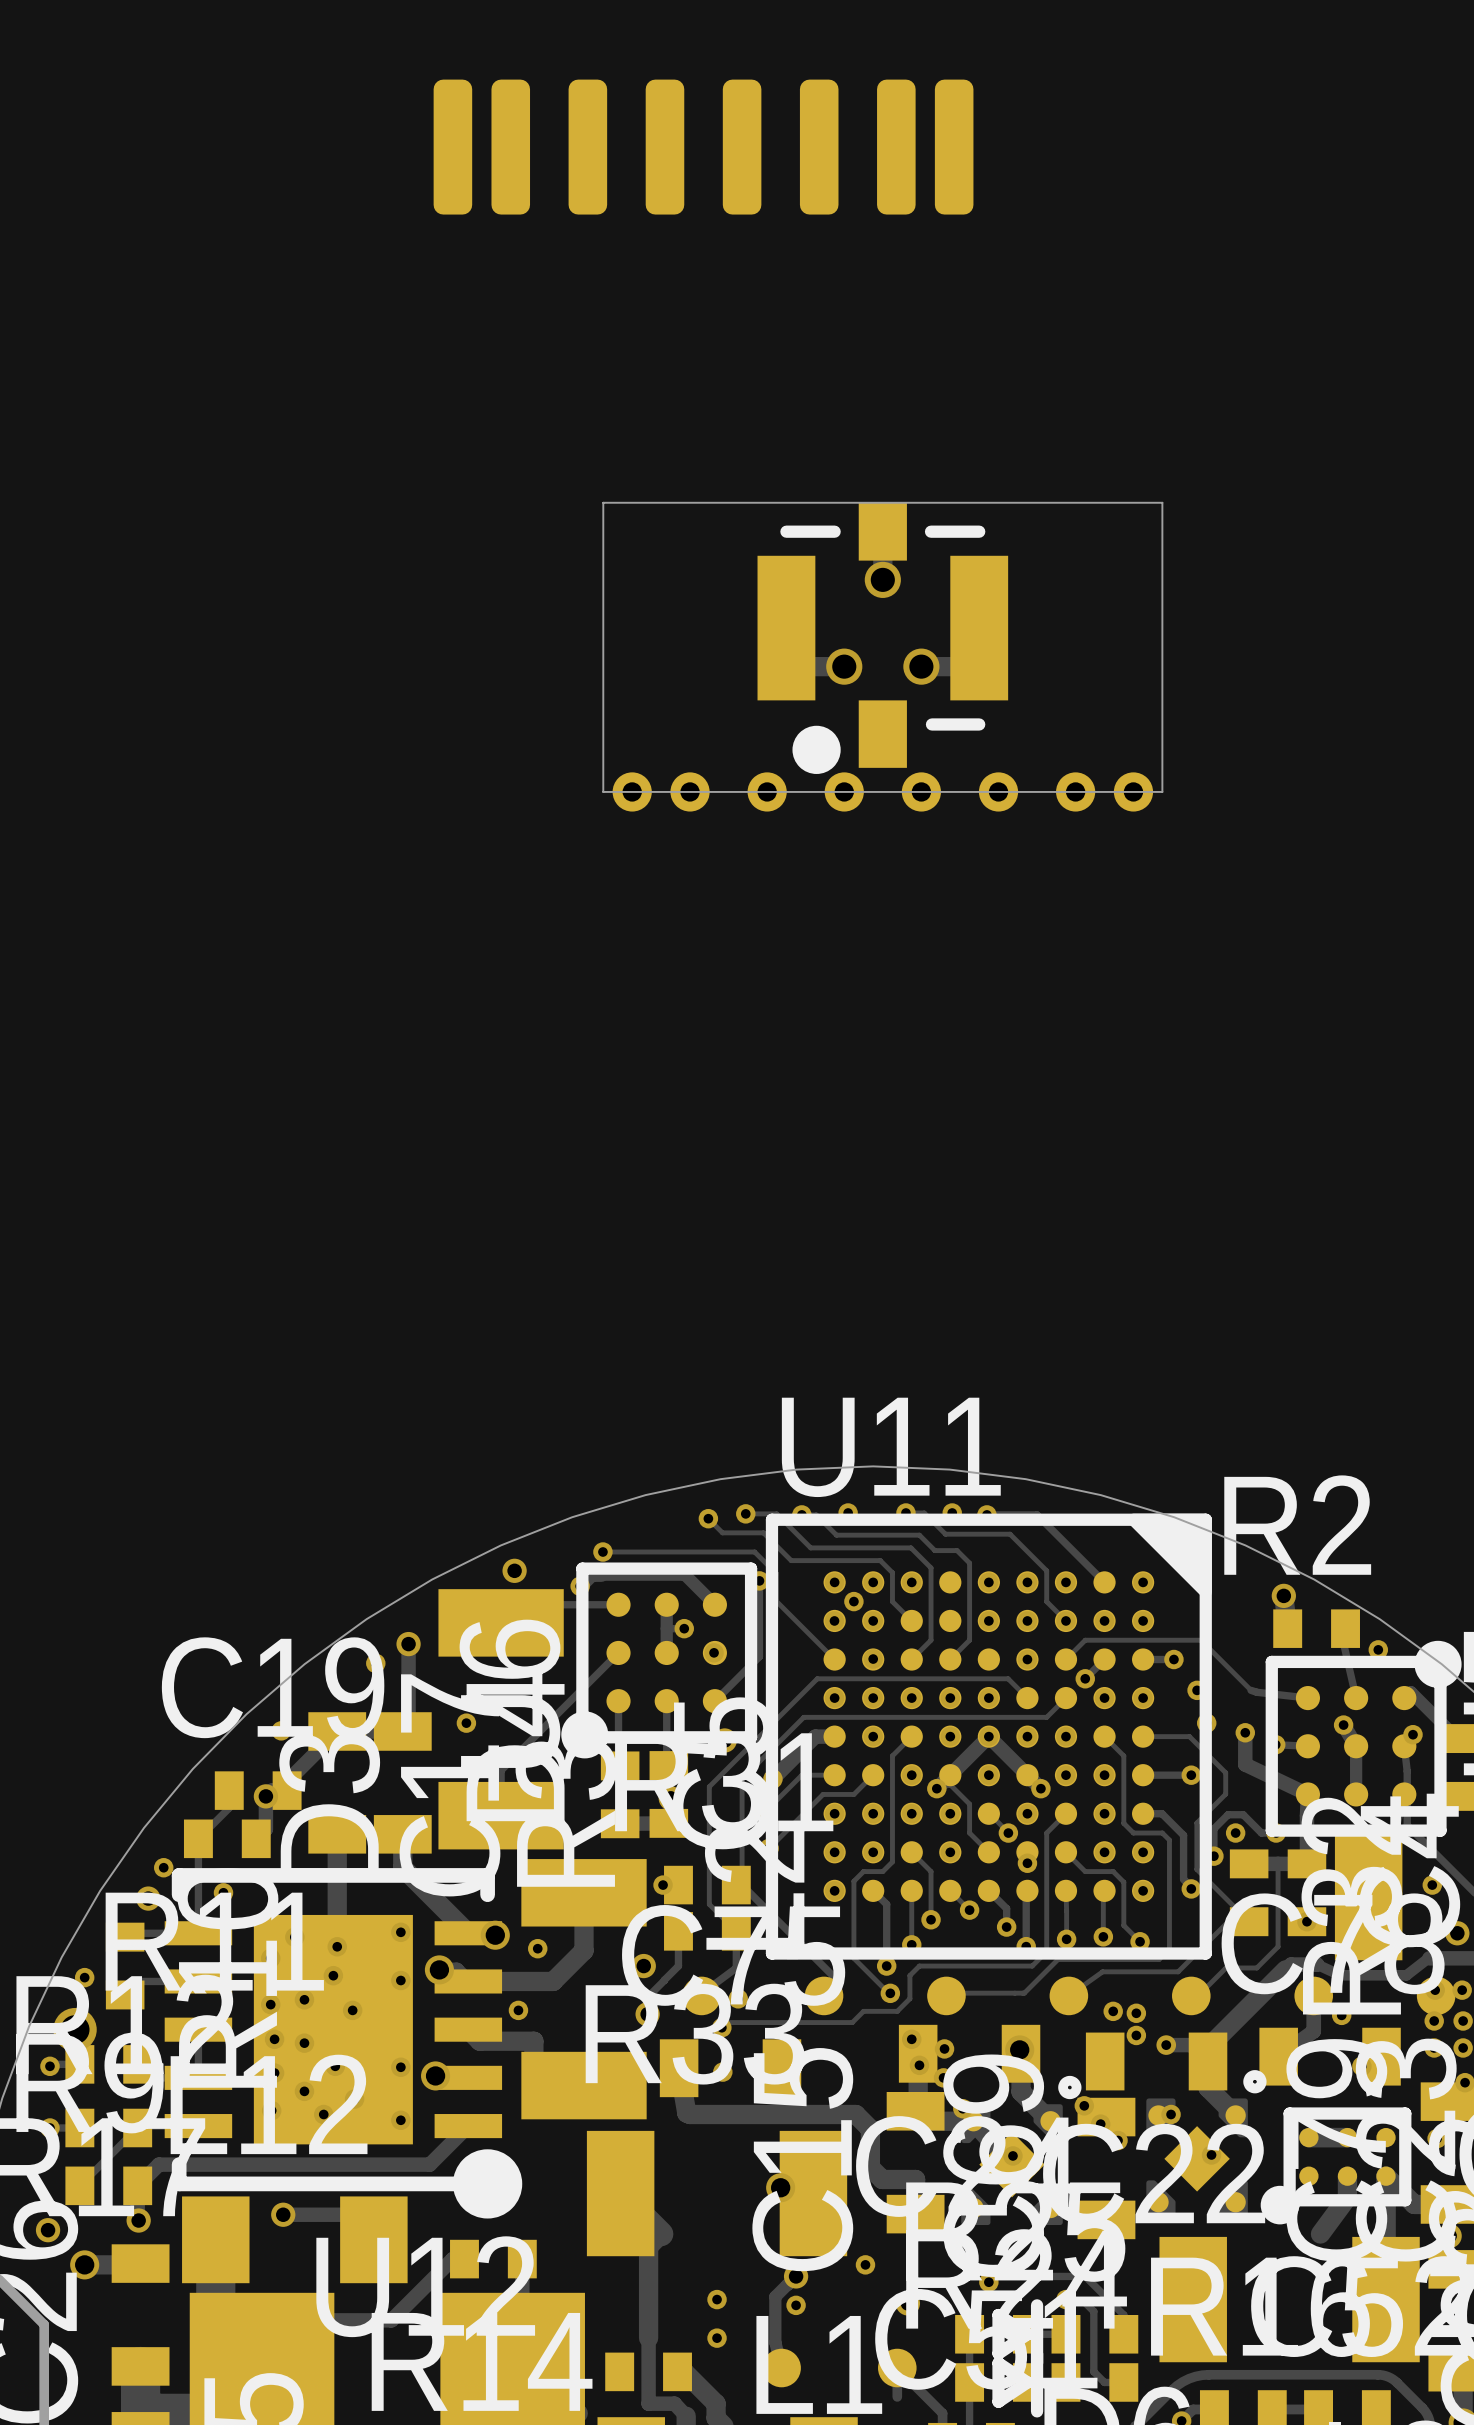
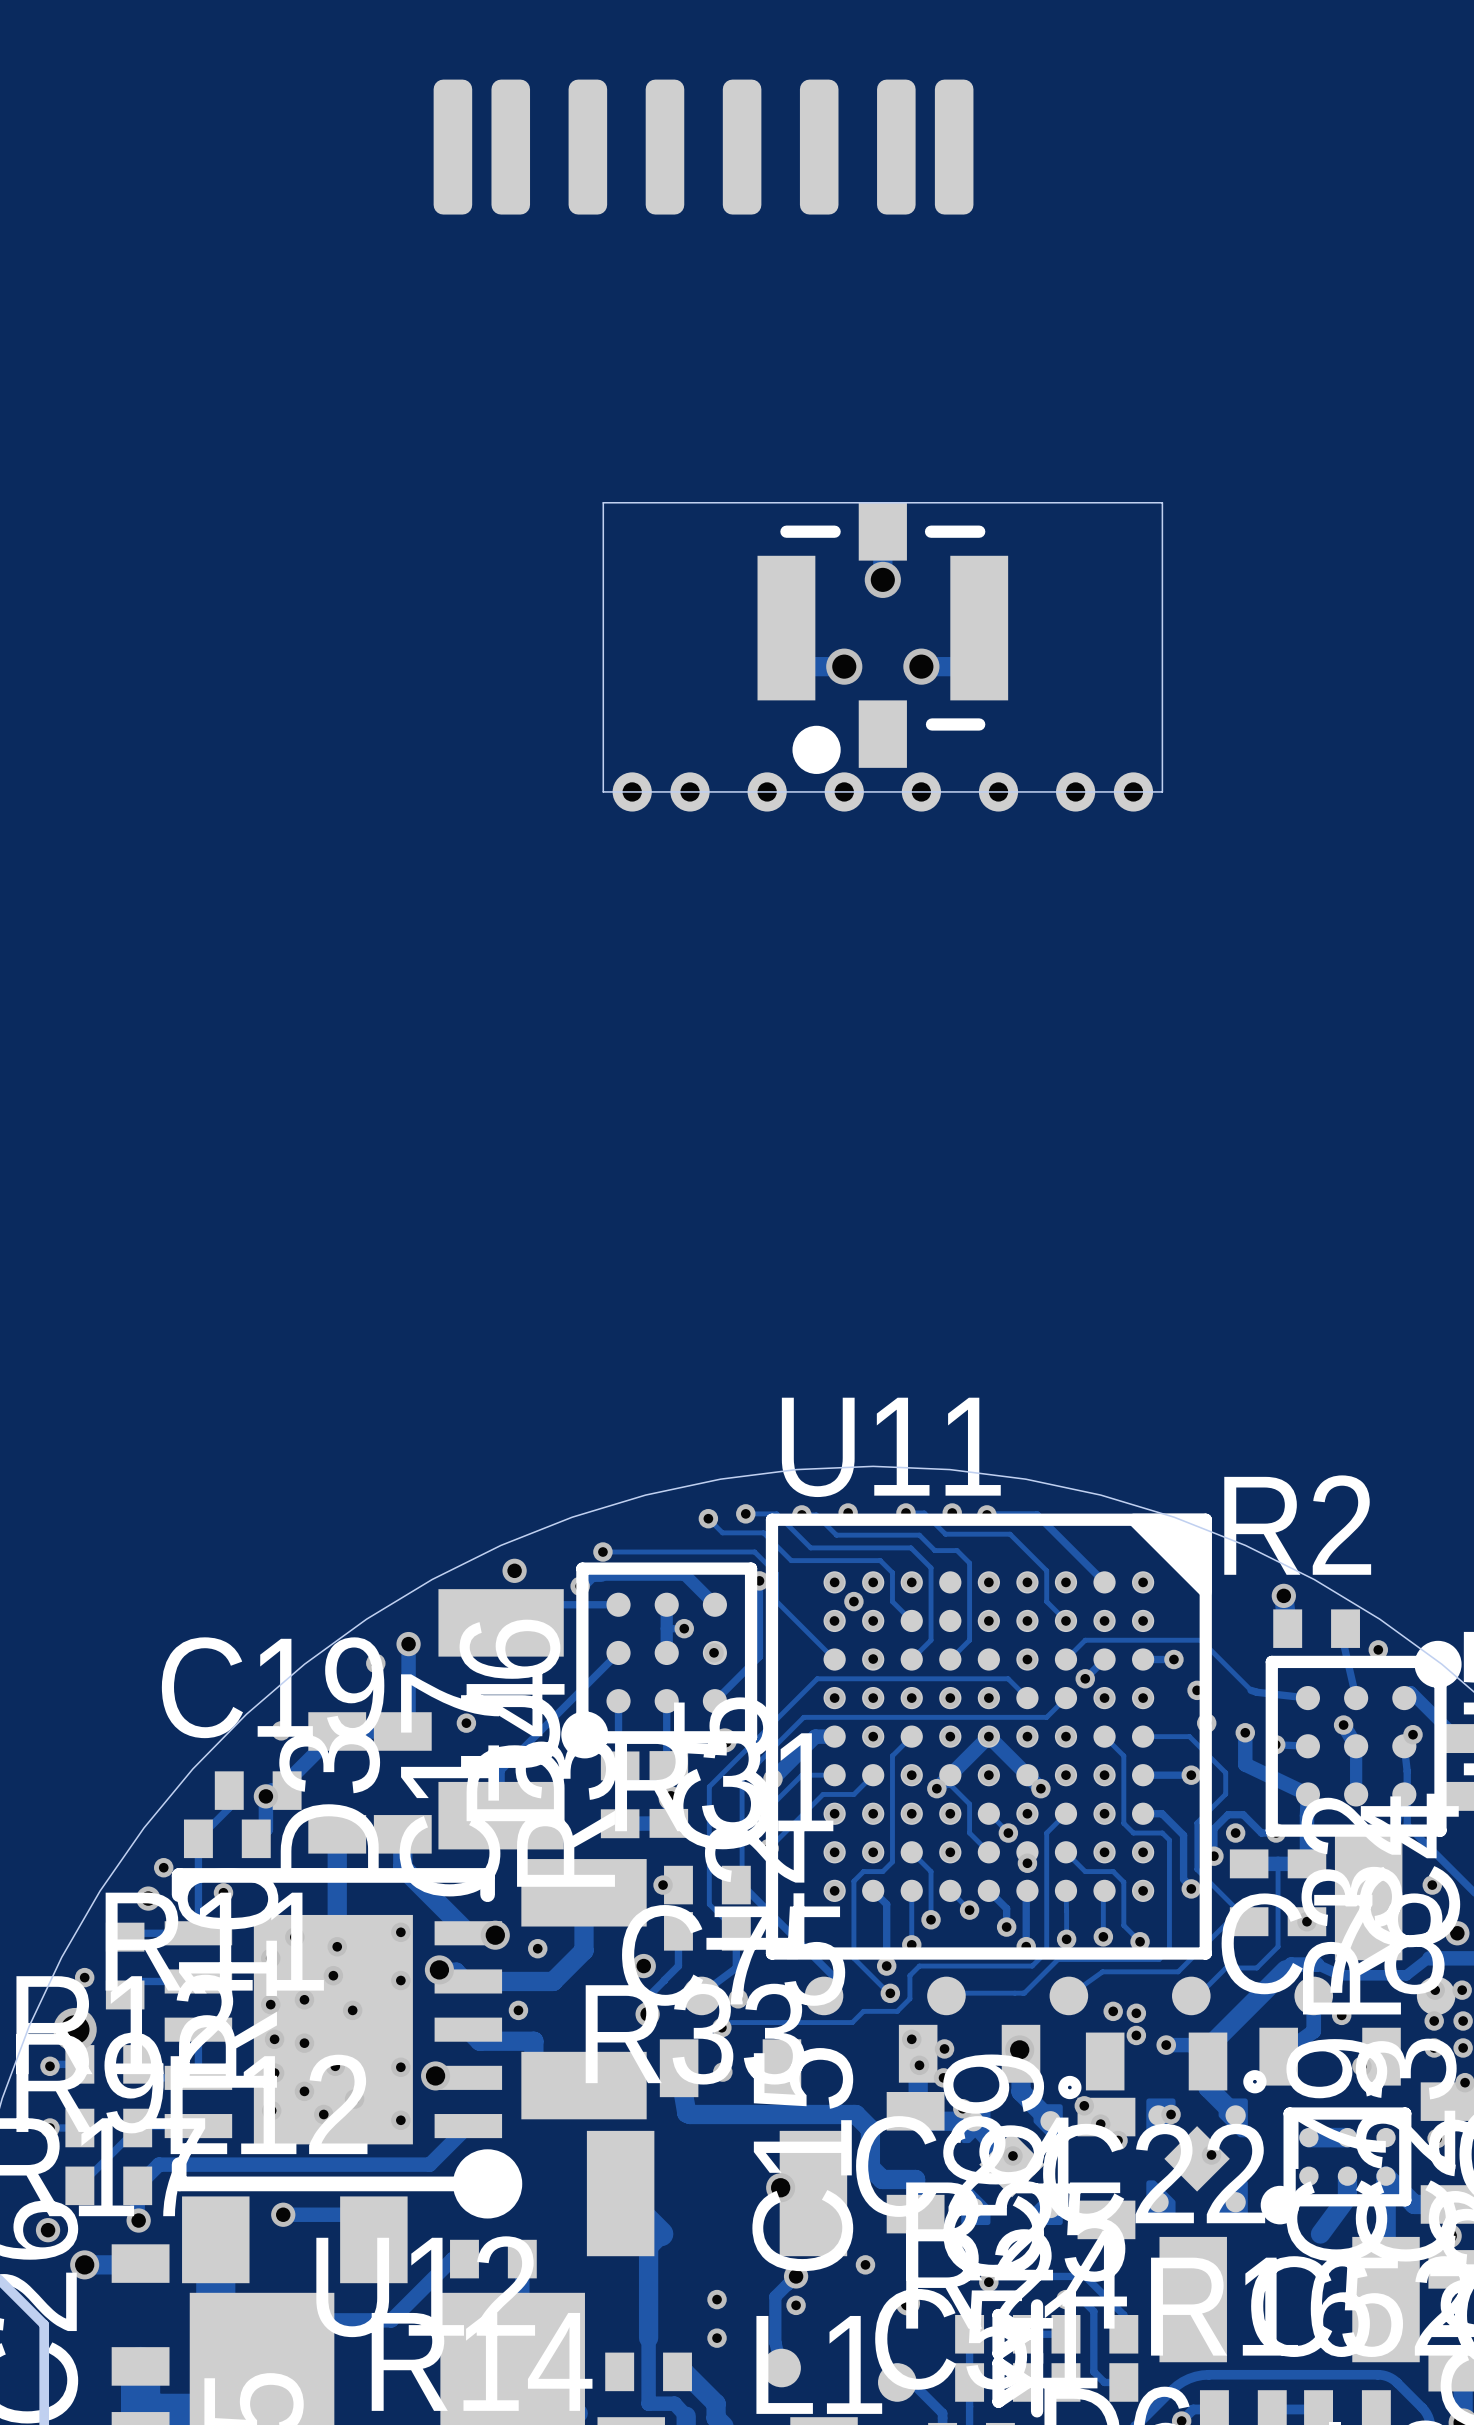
part position: (897, 2368) -> (897, 2382)

